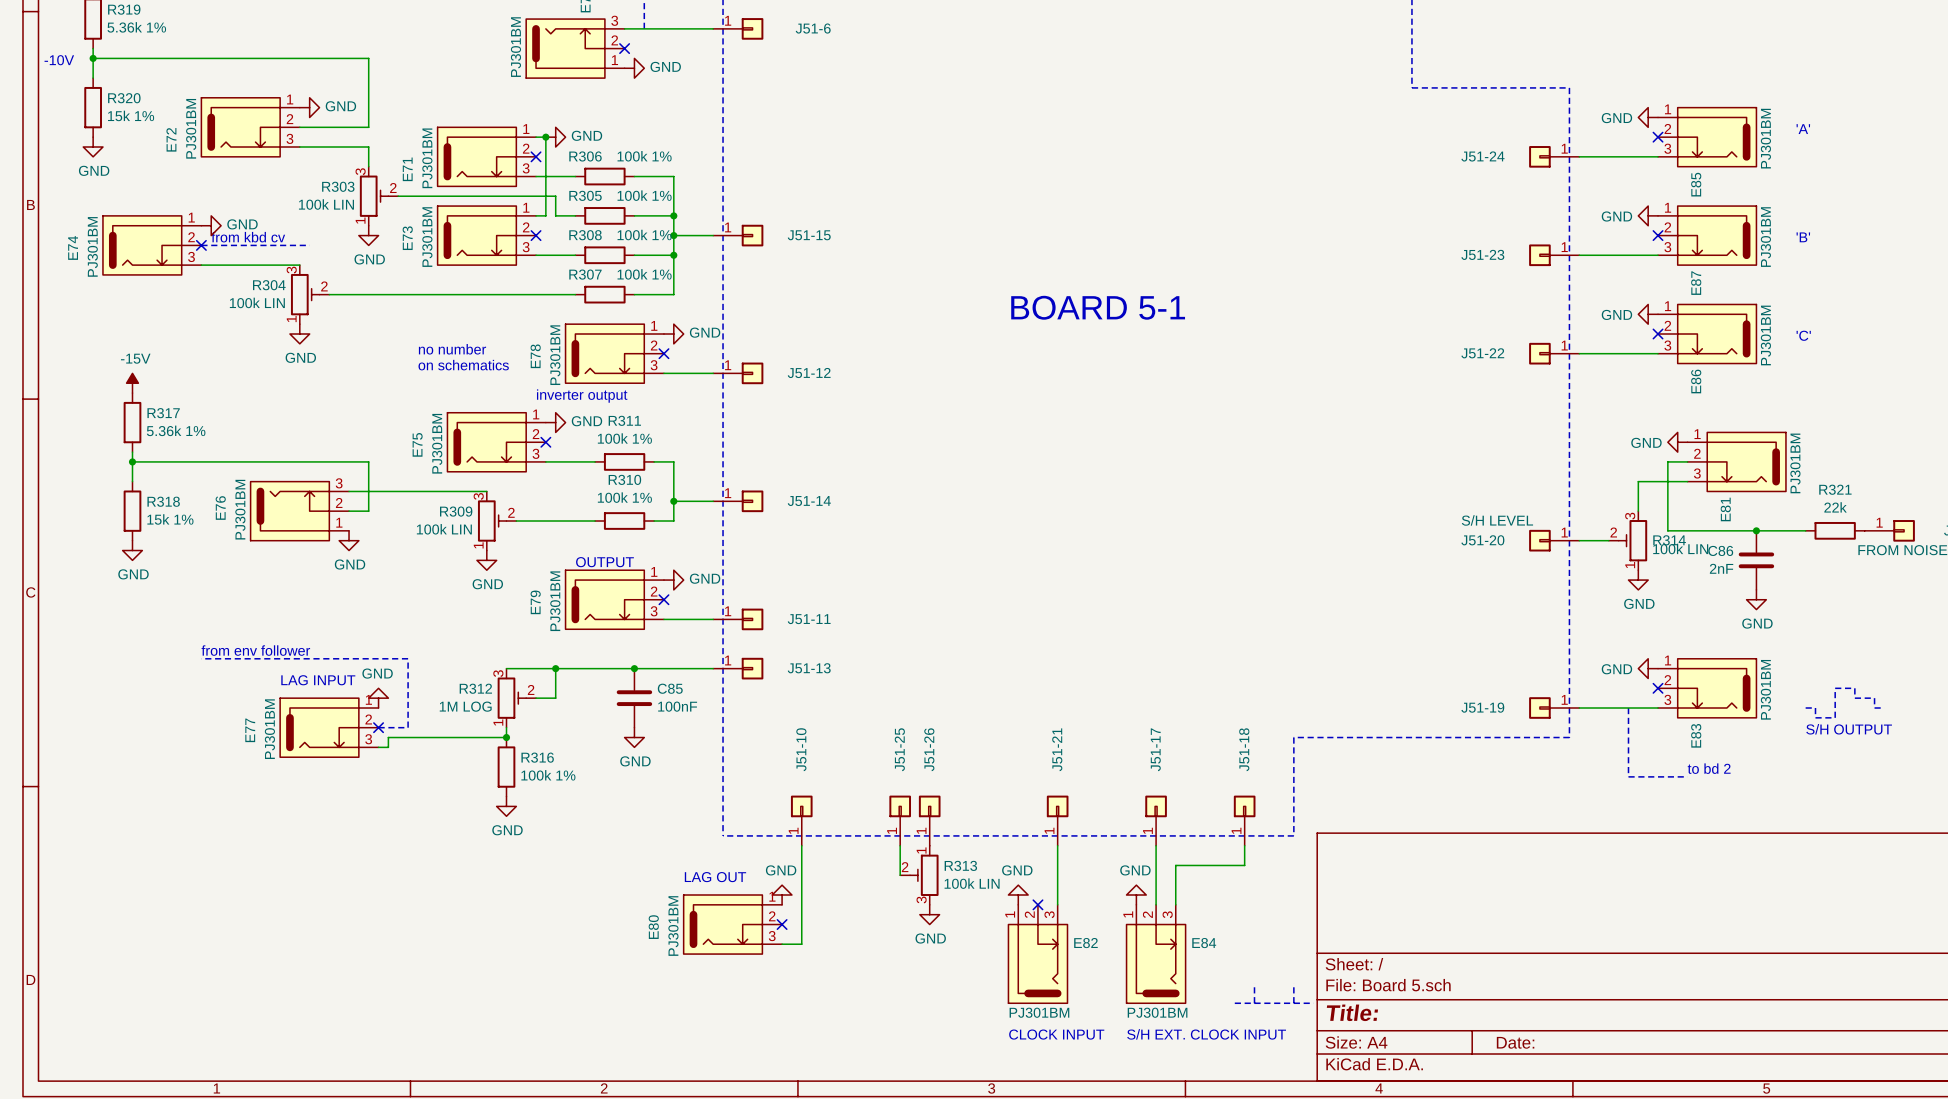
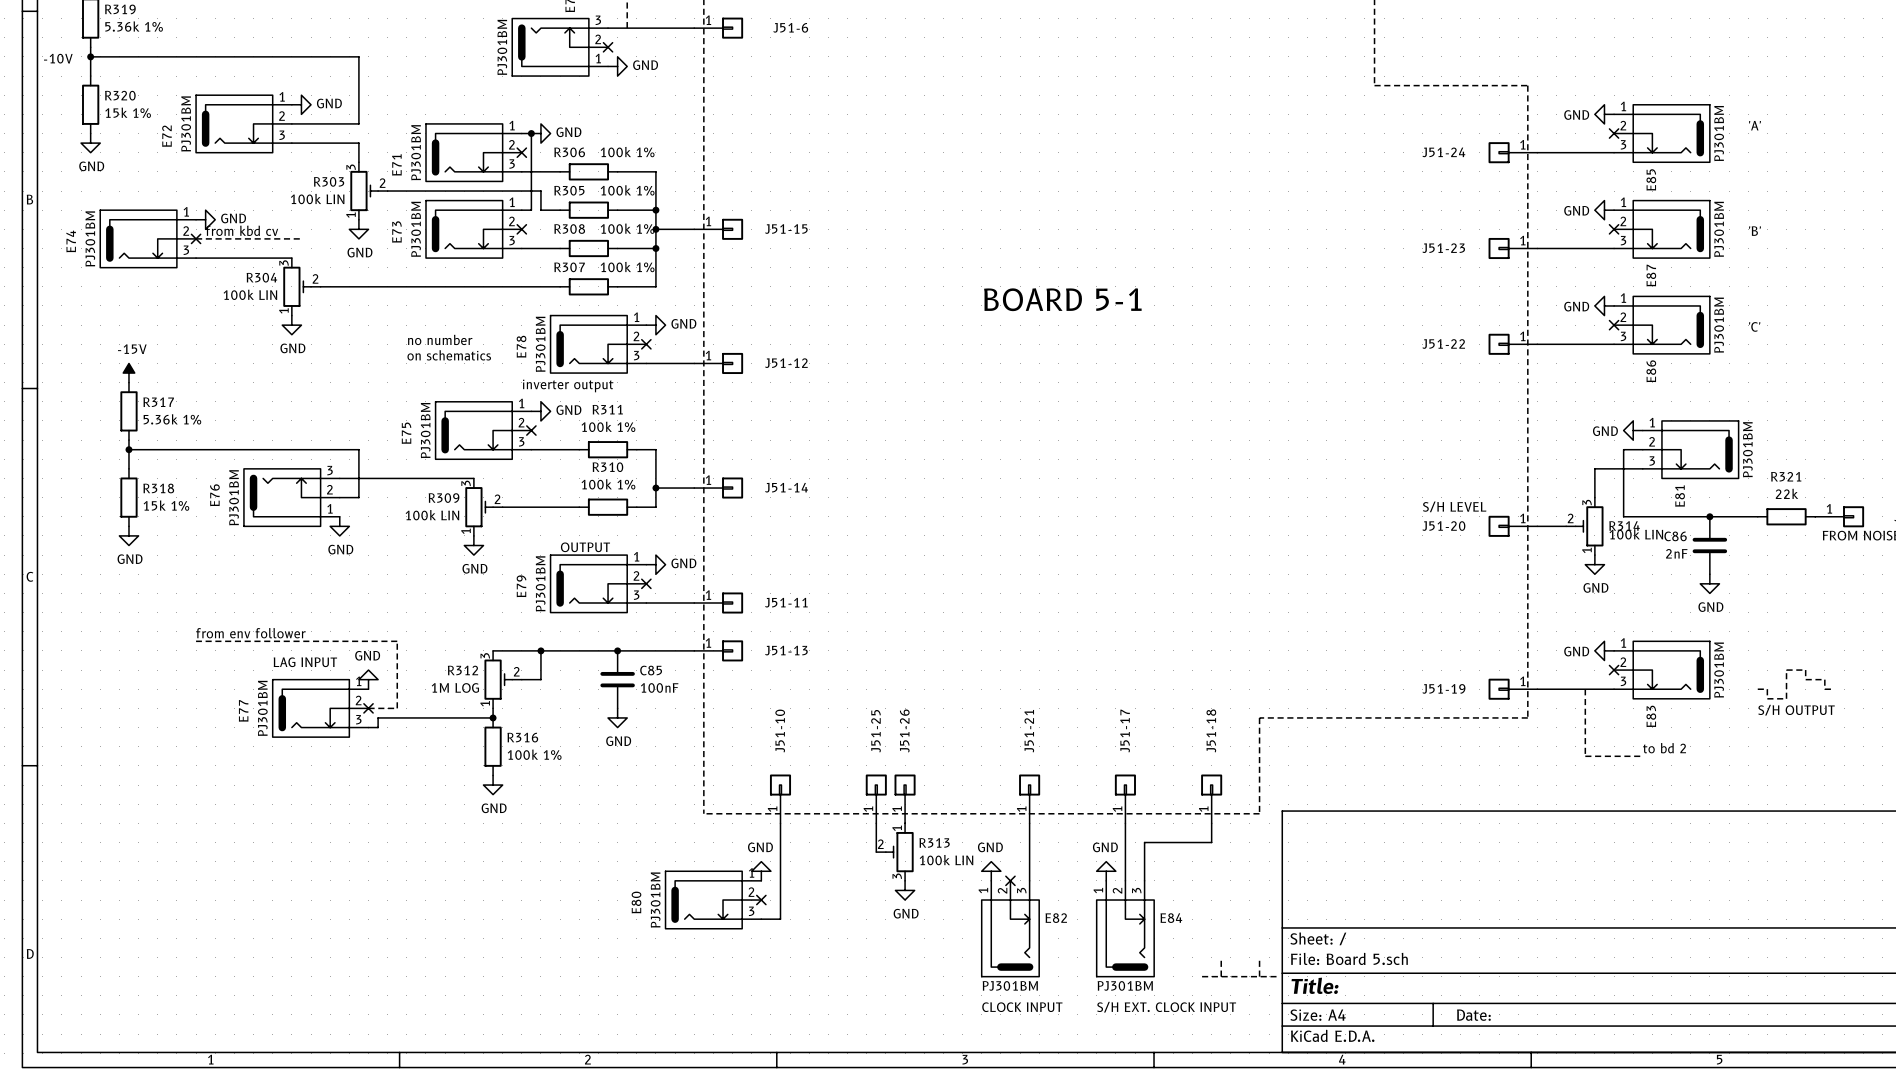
text: LAG OUT (715, 877) -> none

